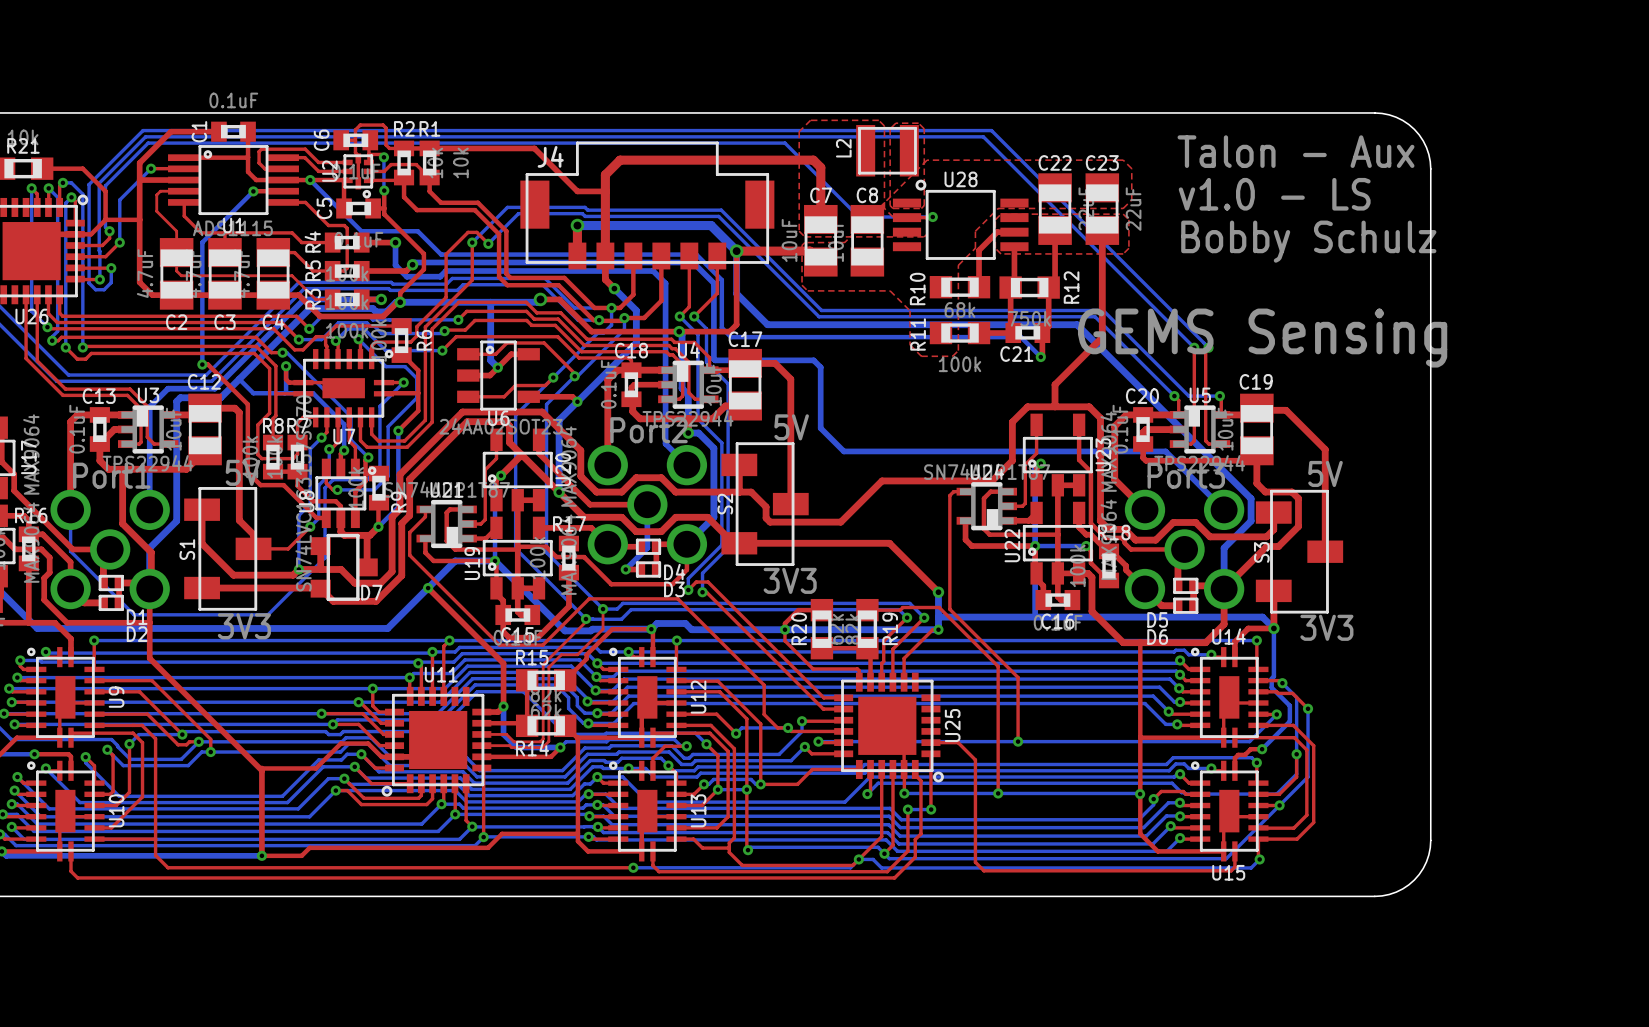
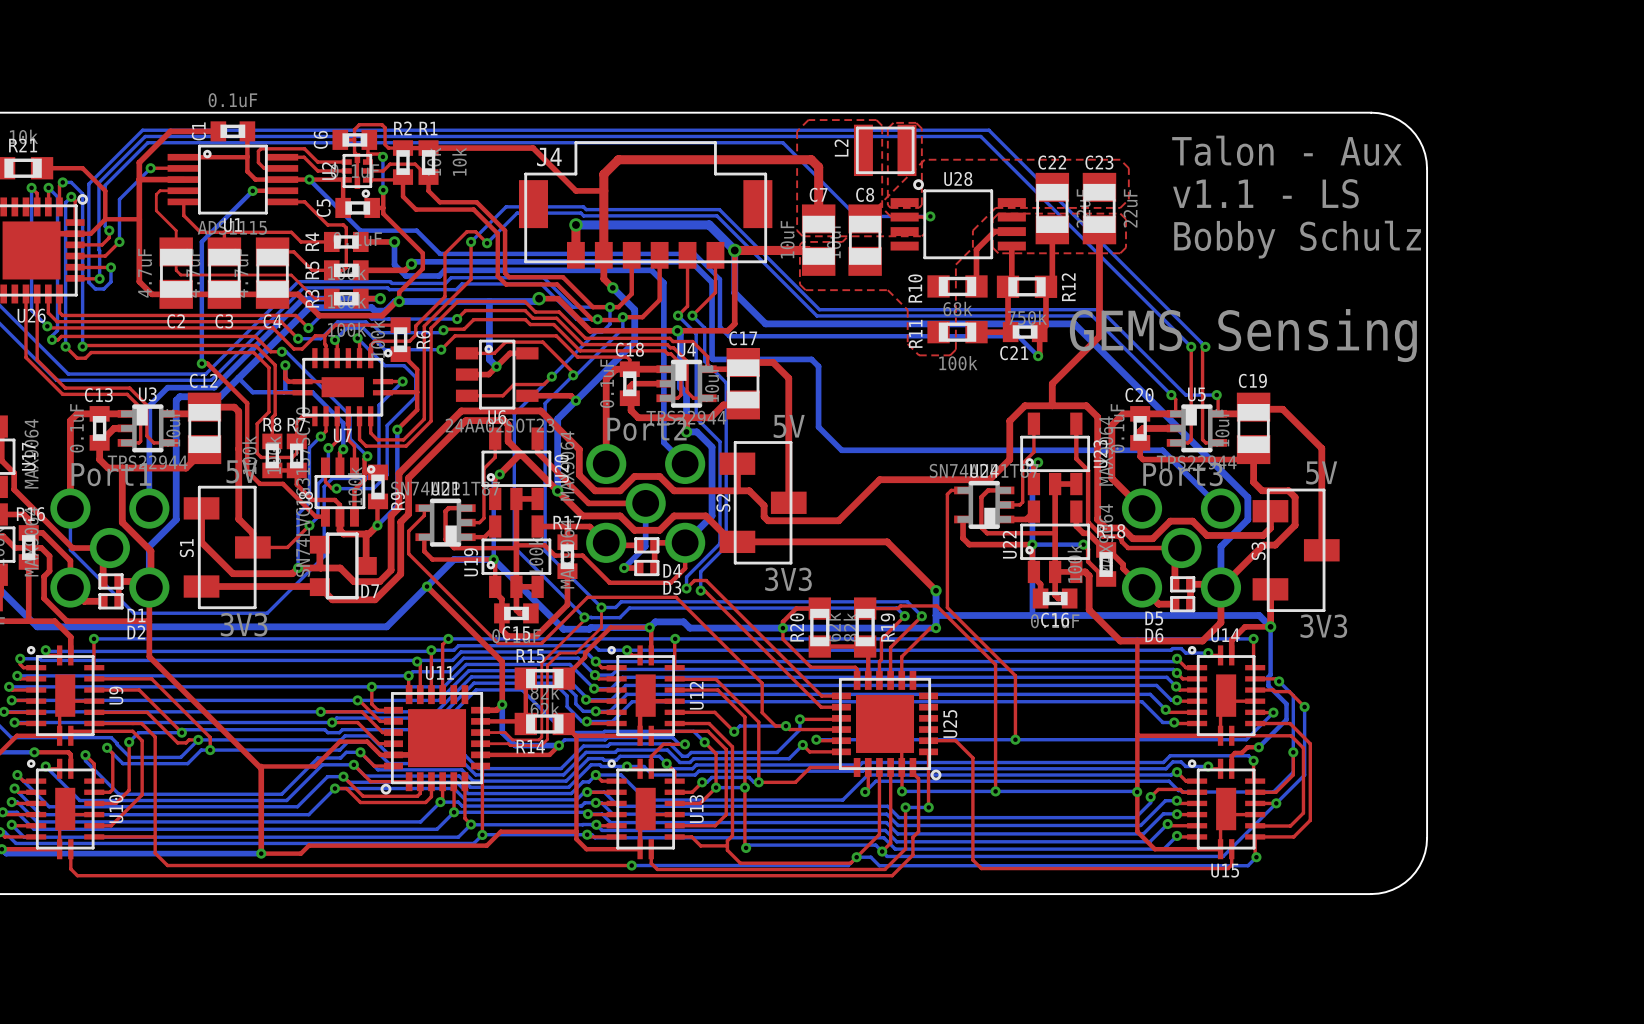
text: v1.0 - LS (1274, 194) -> v1.1 - LS (1265, 193)

